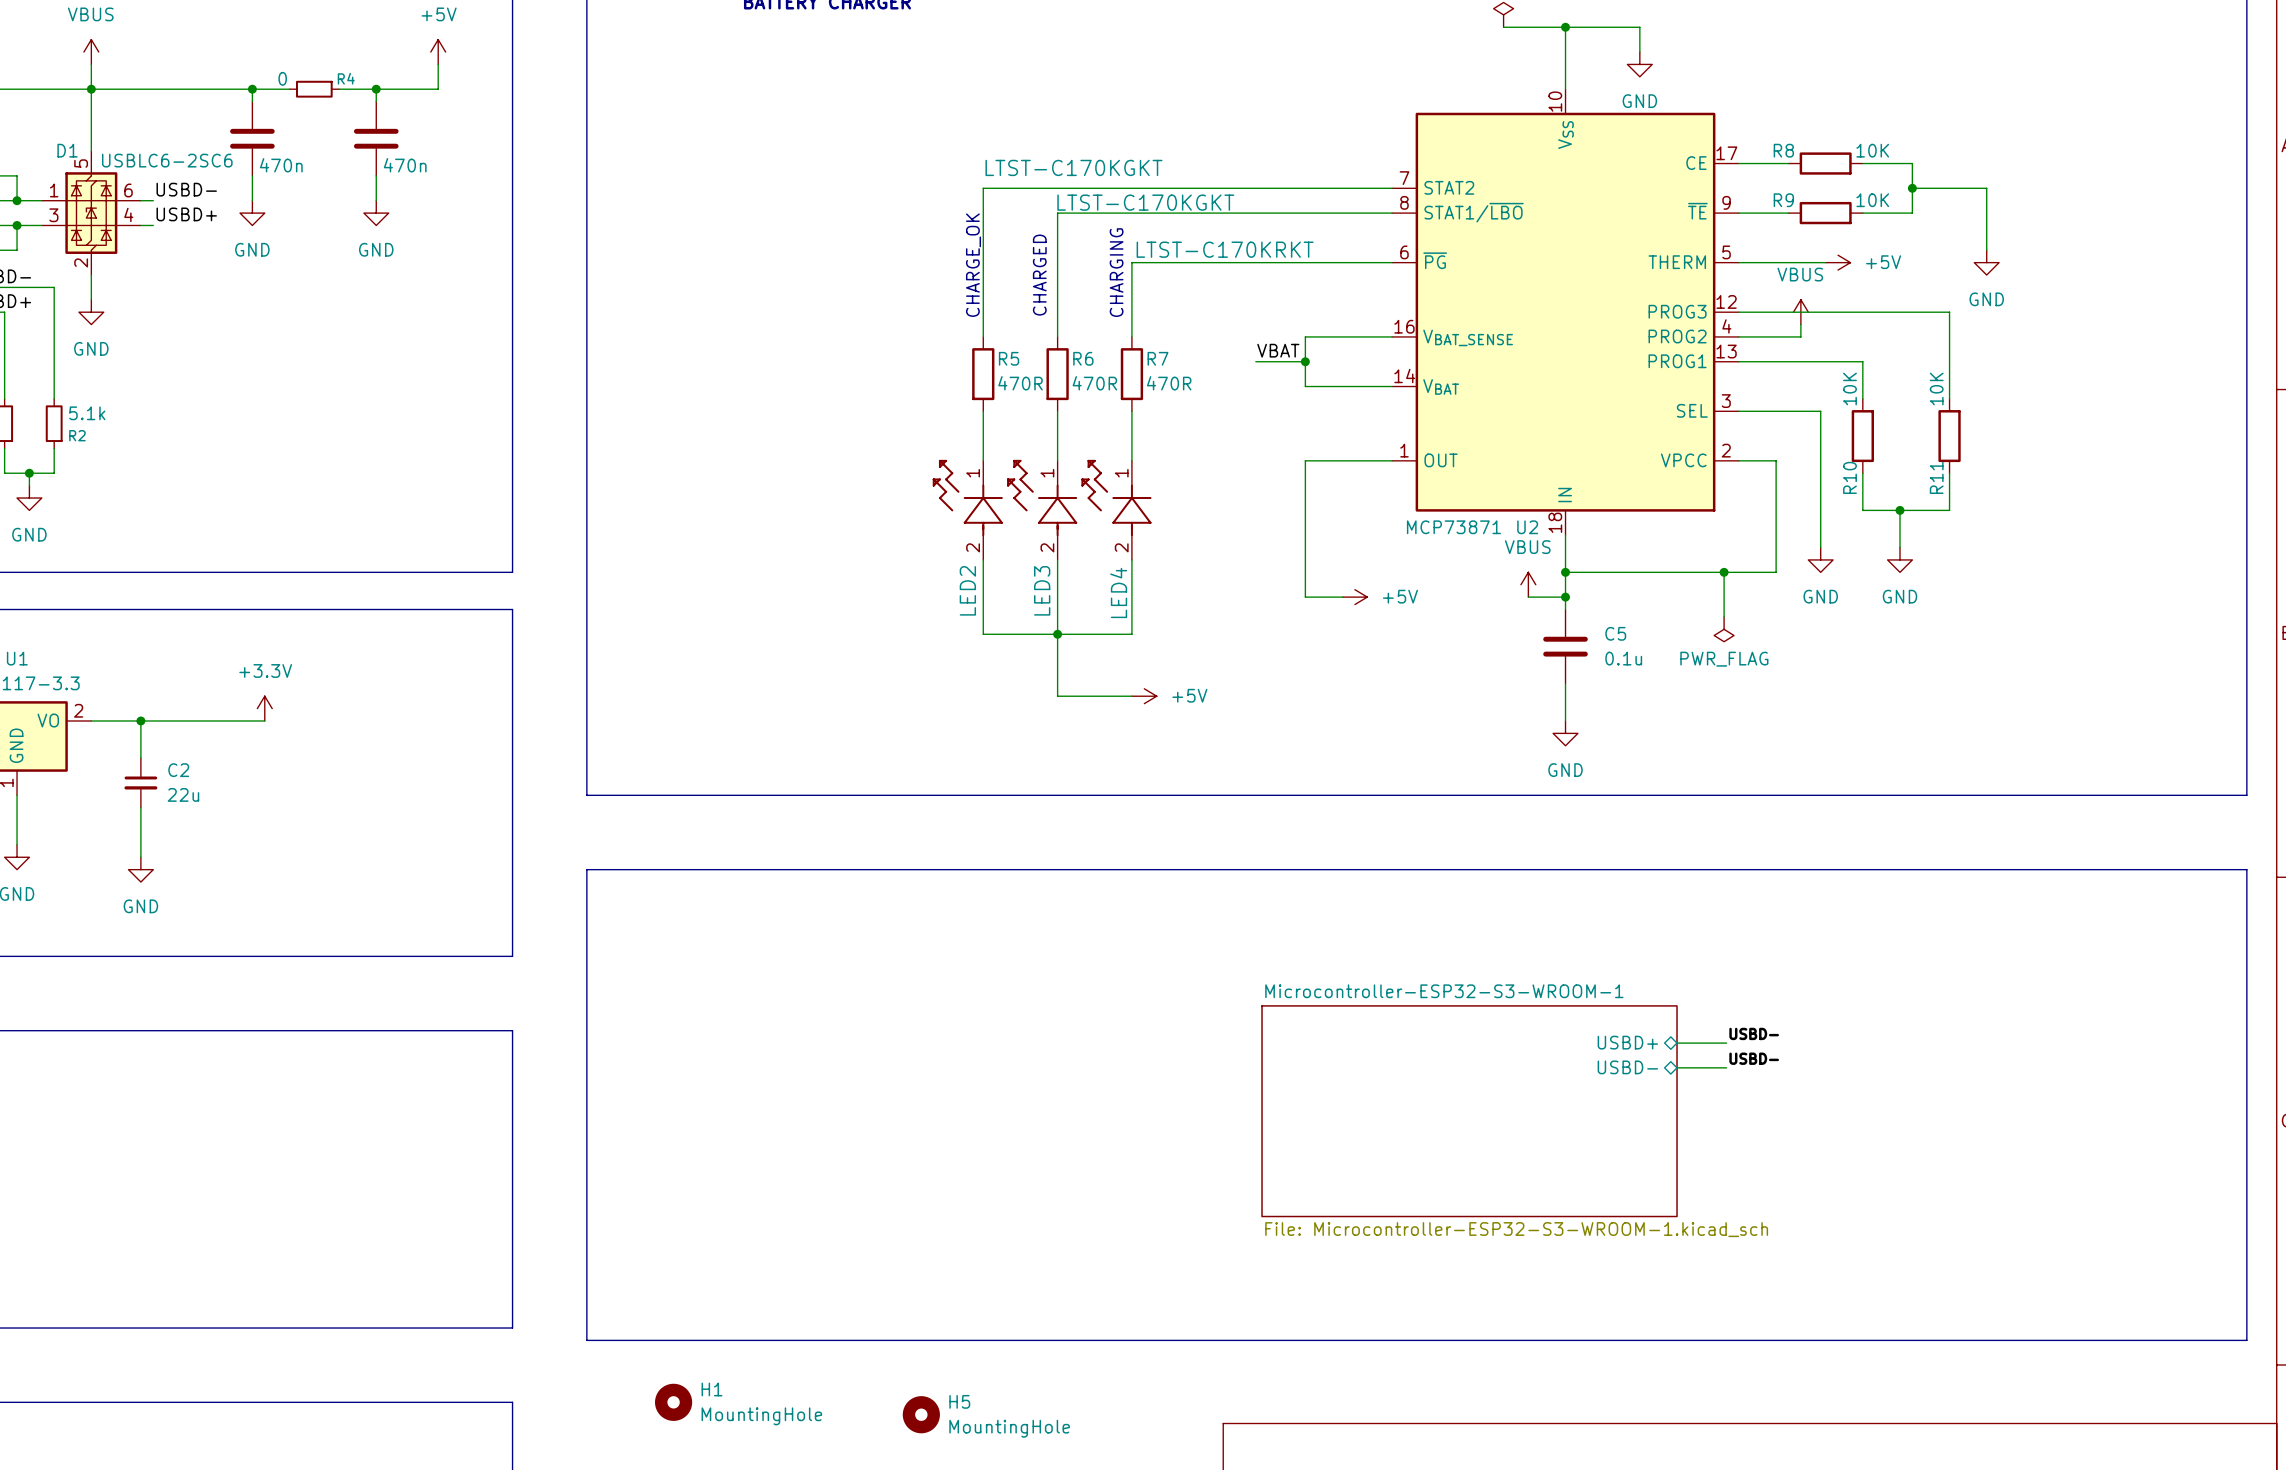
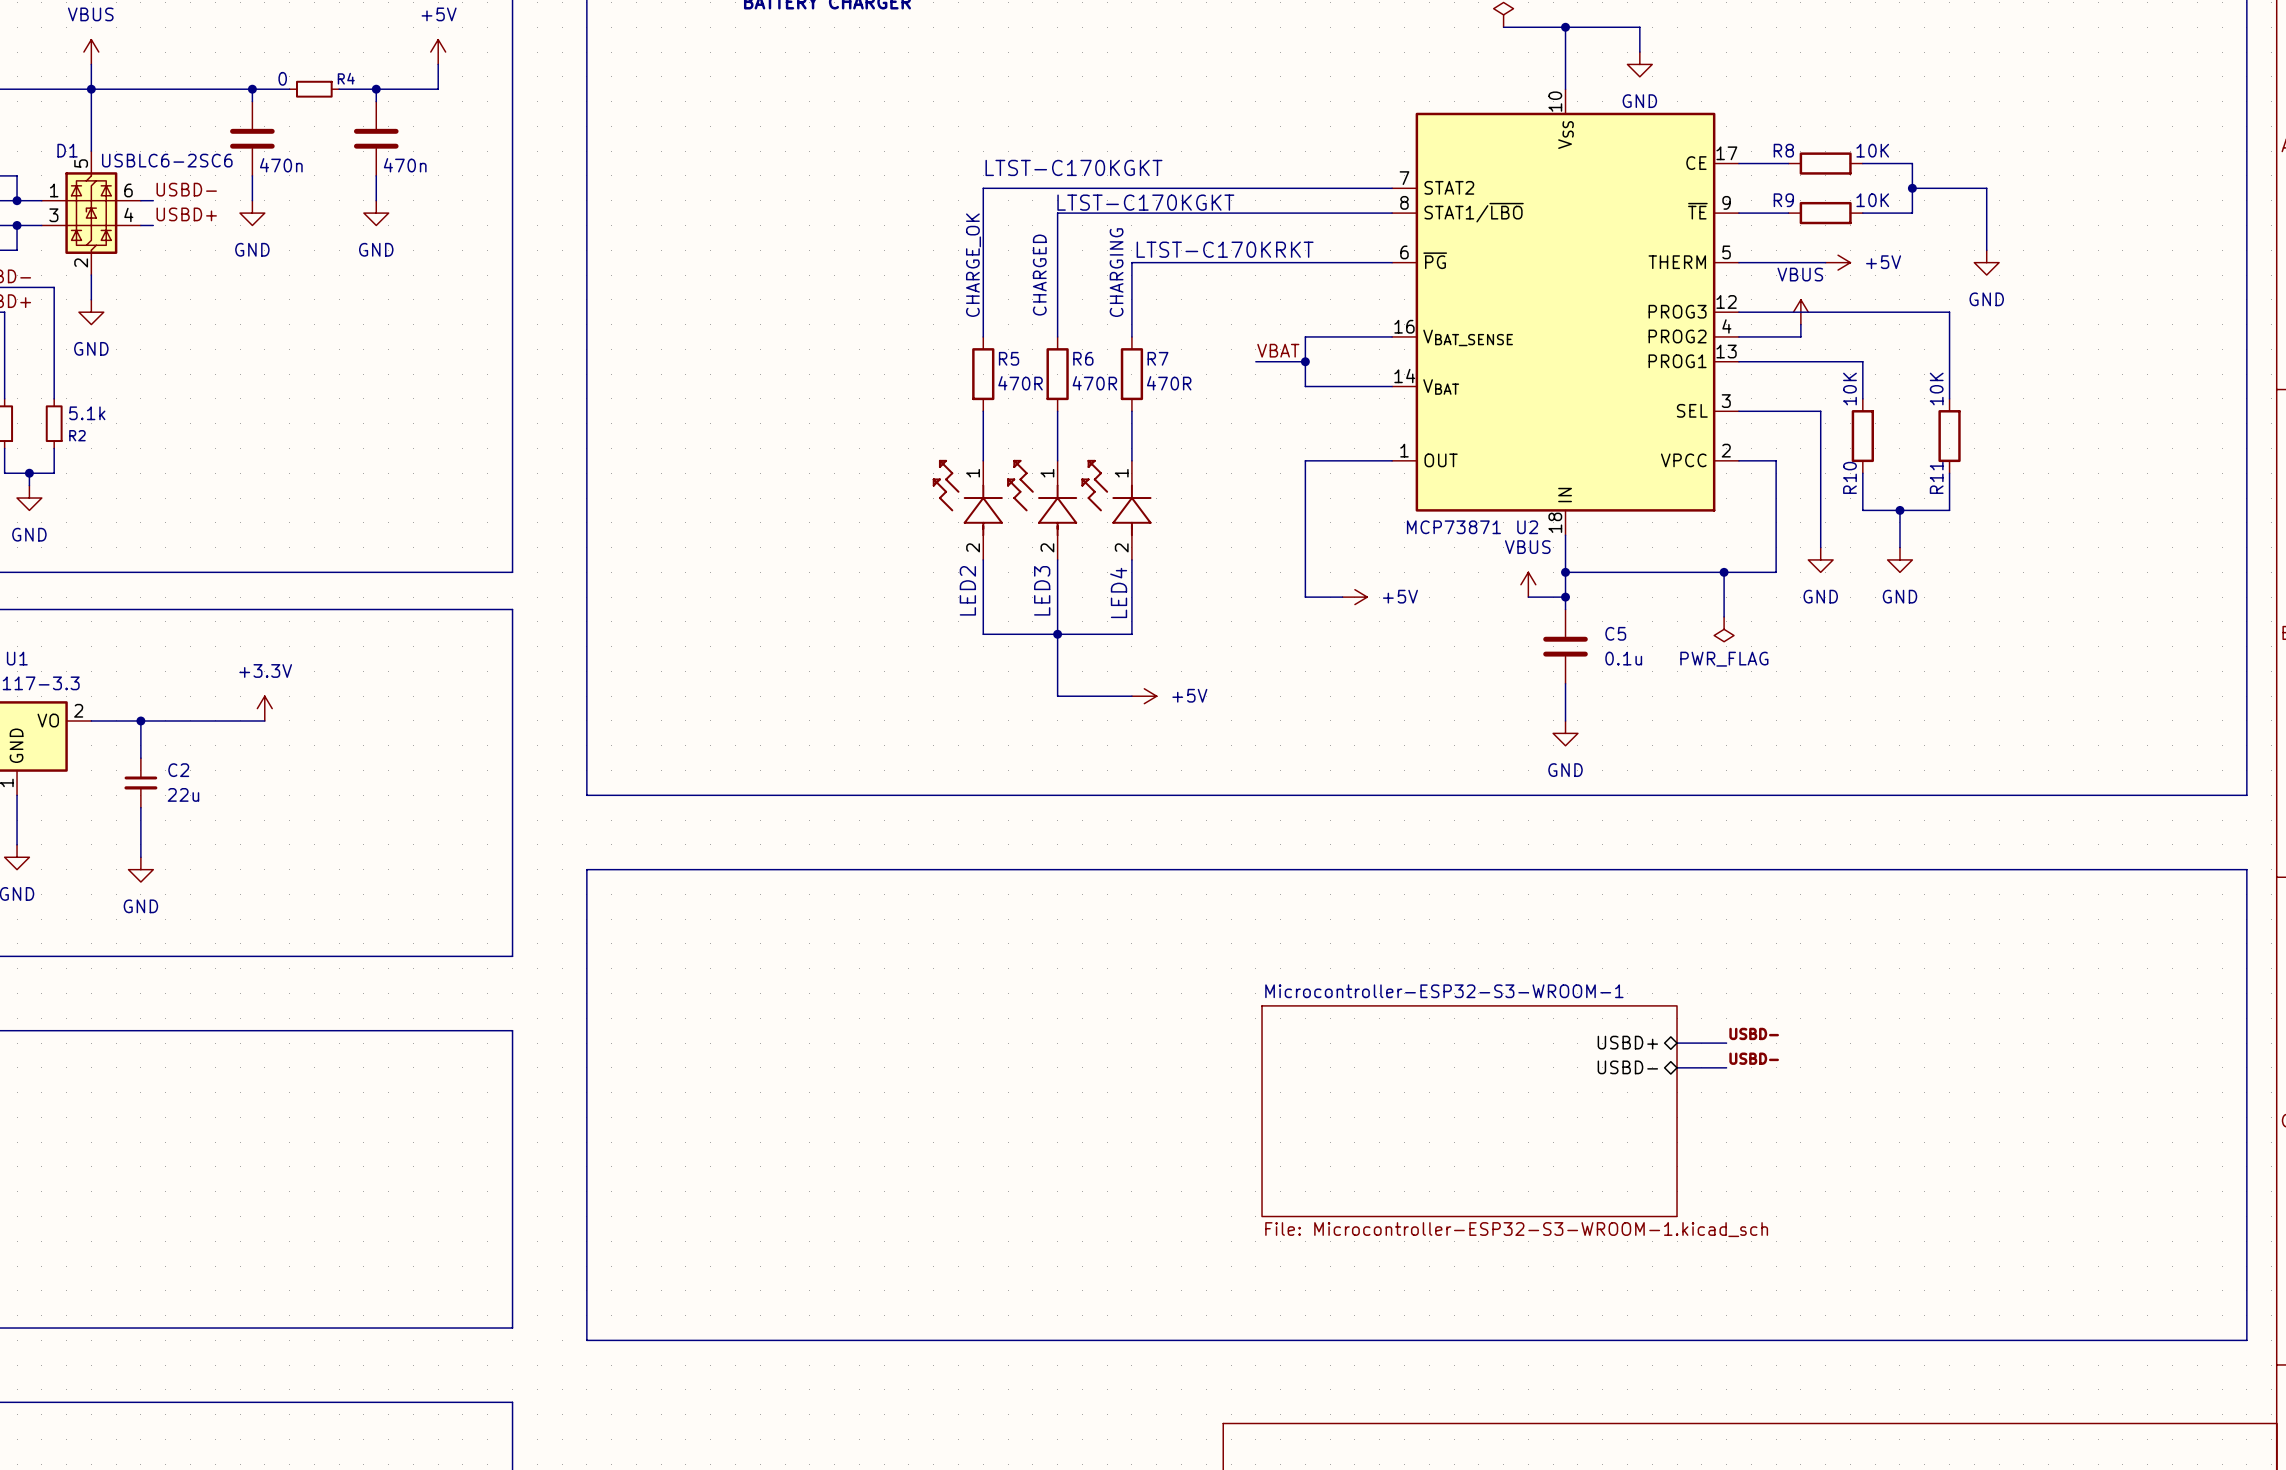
H1: MountingHole (673, 1402) -> none
H5: MountingHole (921, 1414) -> none

